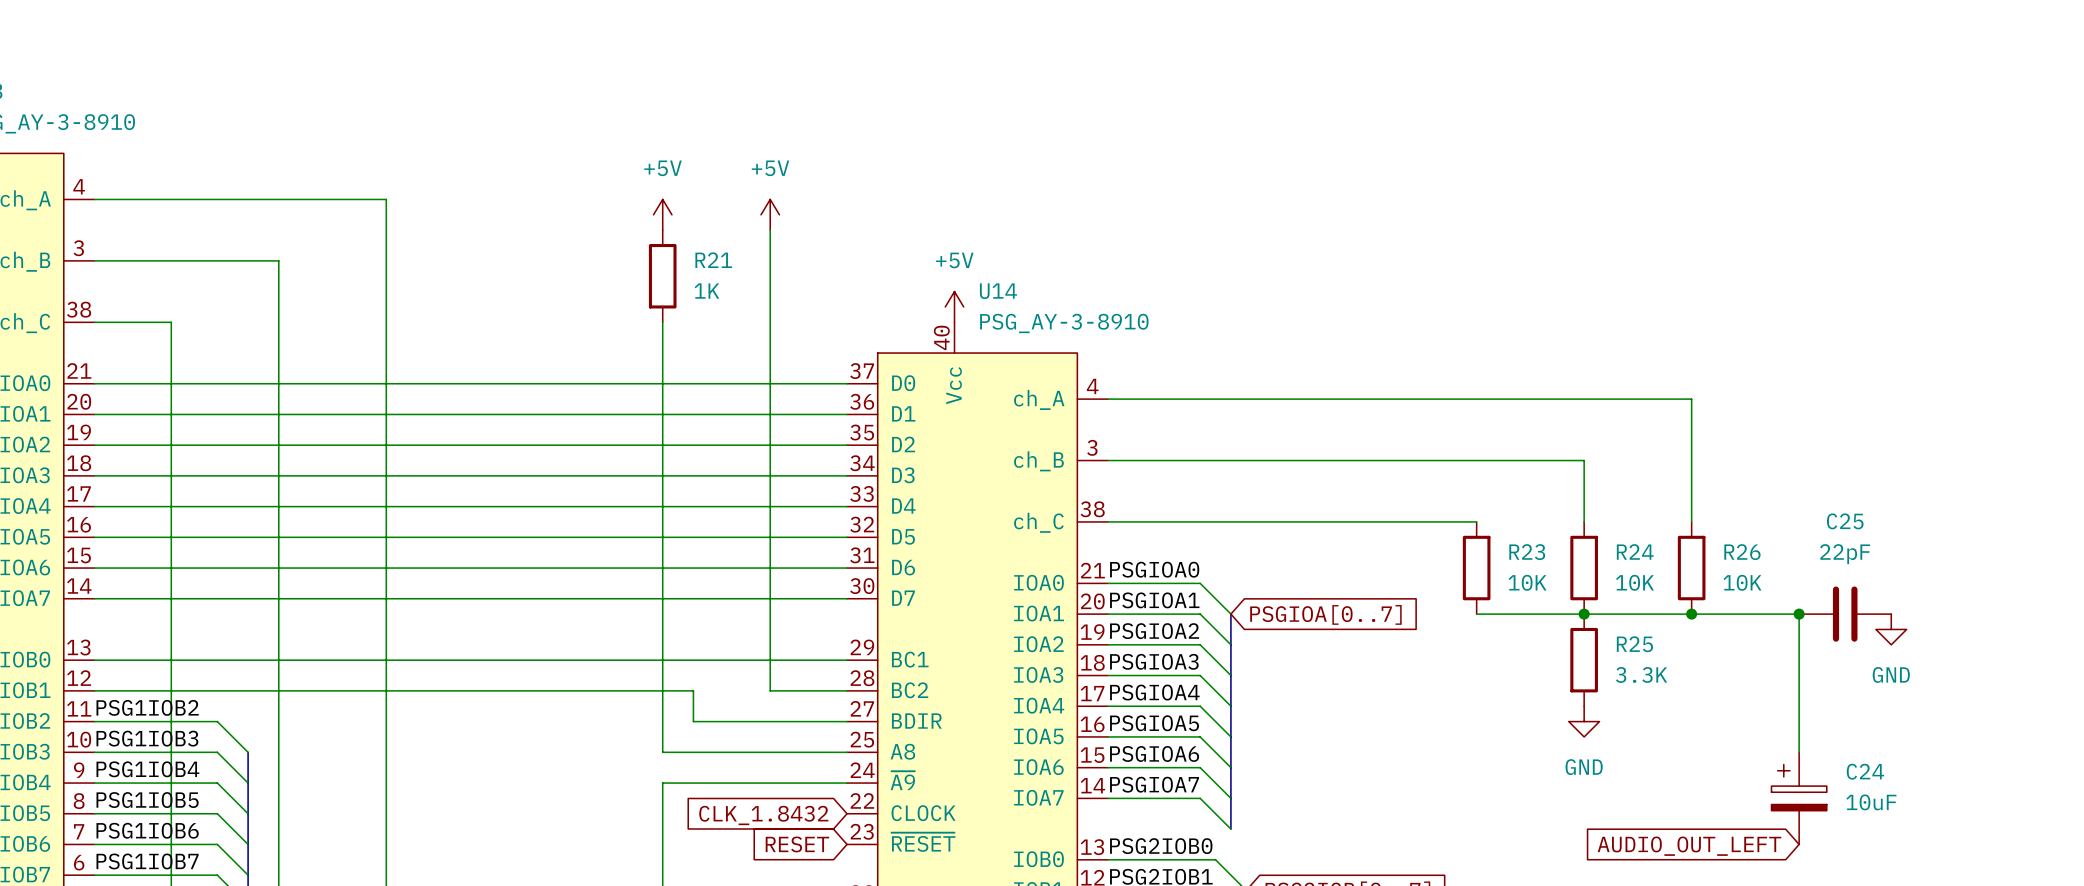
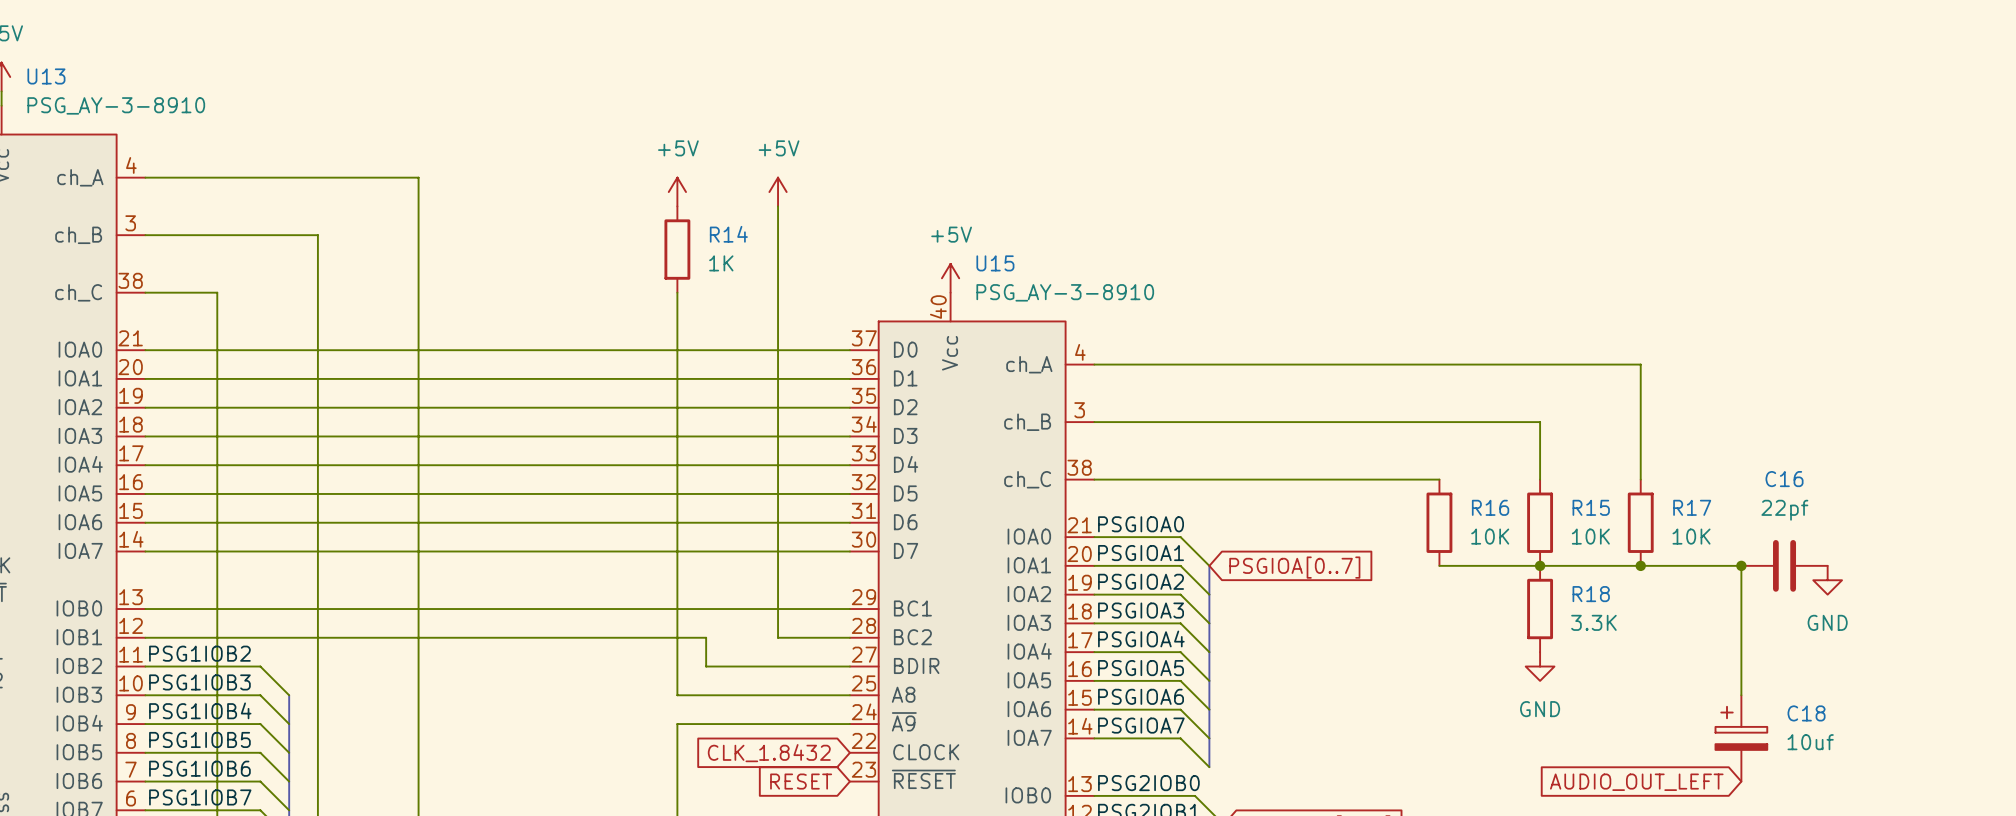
R21 name: R21 (713, 260) -> R14 (728, 234)
U14 name: U14 (998, 291) -> U15 (995, 263)
C25 name: C25 (1845, 521) -> C16 (1784, 479)
R24 name: R24 (1635, 551) -> R15 (1591, 507)
R23 name: R23 (1527, 552) -> R16 (1490, 507)
R26 name: R26 (1742, 552) -> R17 (1692, 507)
C25 value: 22pF (1845, 554) -> 22pf (1784, 510)
R25 name: R25 (1634, 644) -> R18 (1591, 594)
C24 name: C24 (1865, 771) -> C18 (1806, 713)
C24 value: 10uF (1871, 802) -> 10uf (1810, 742)

